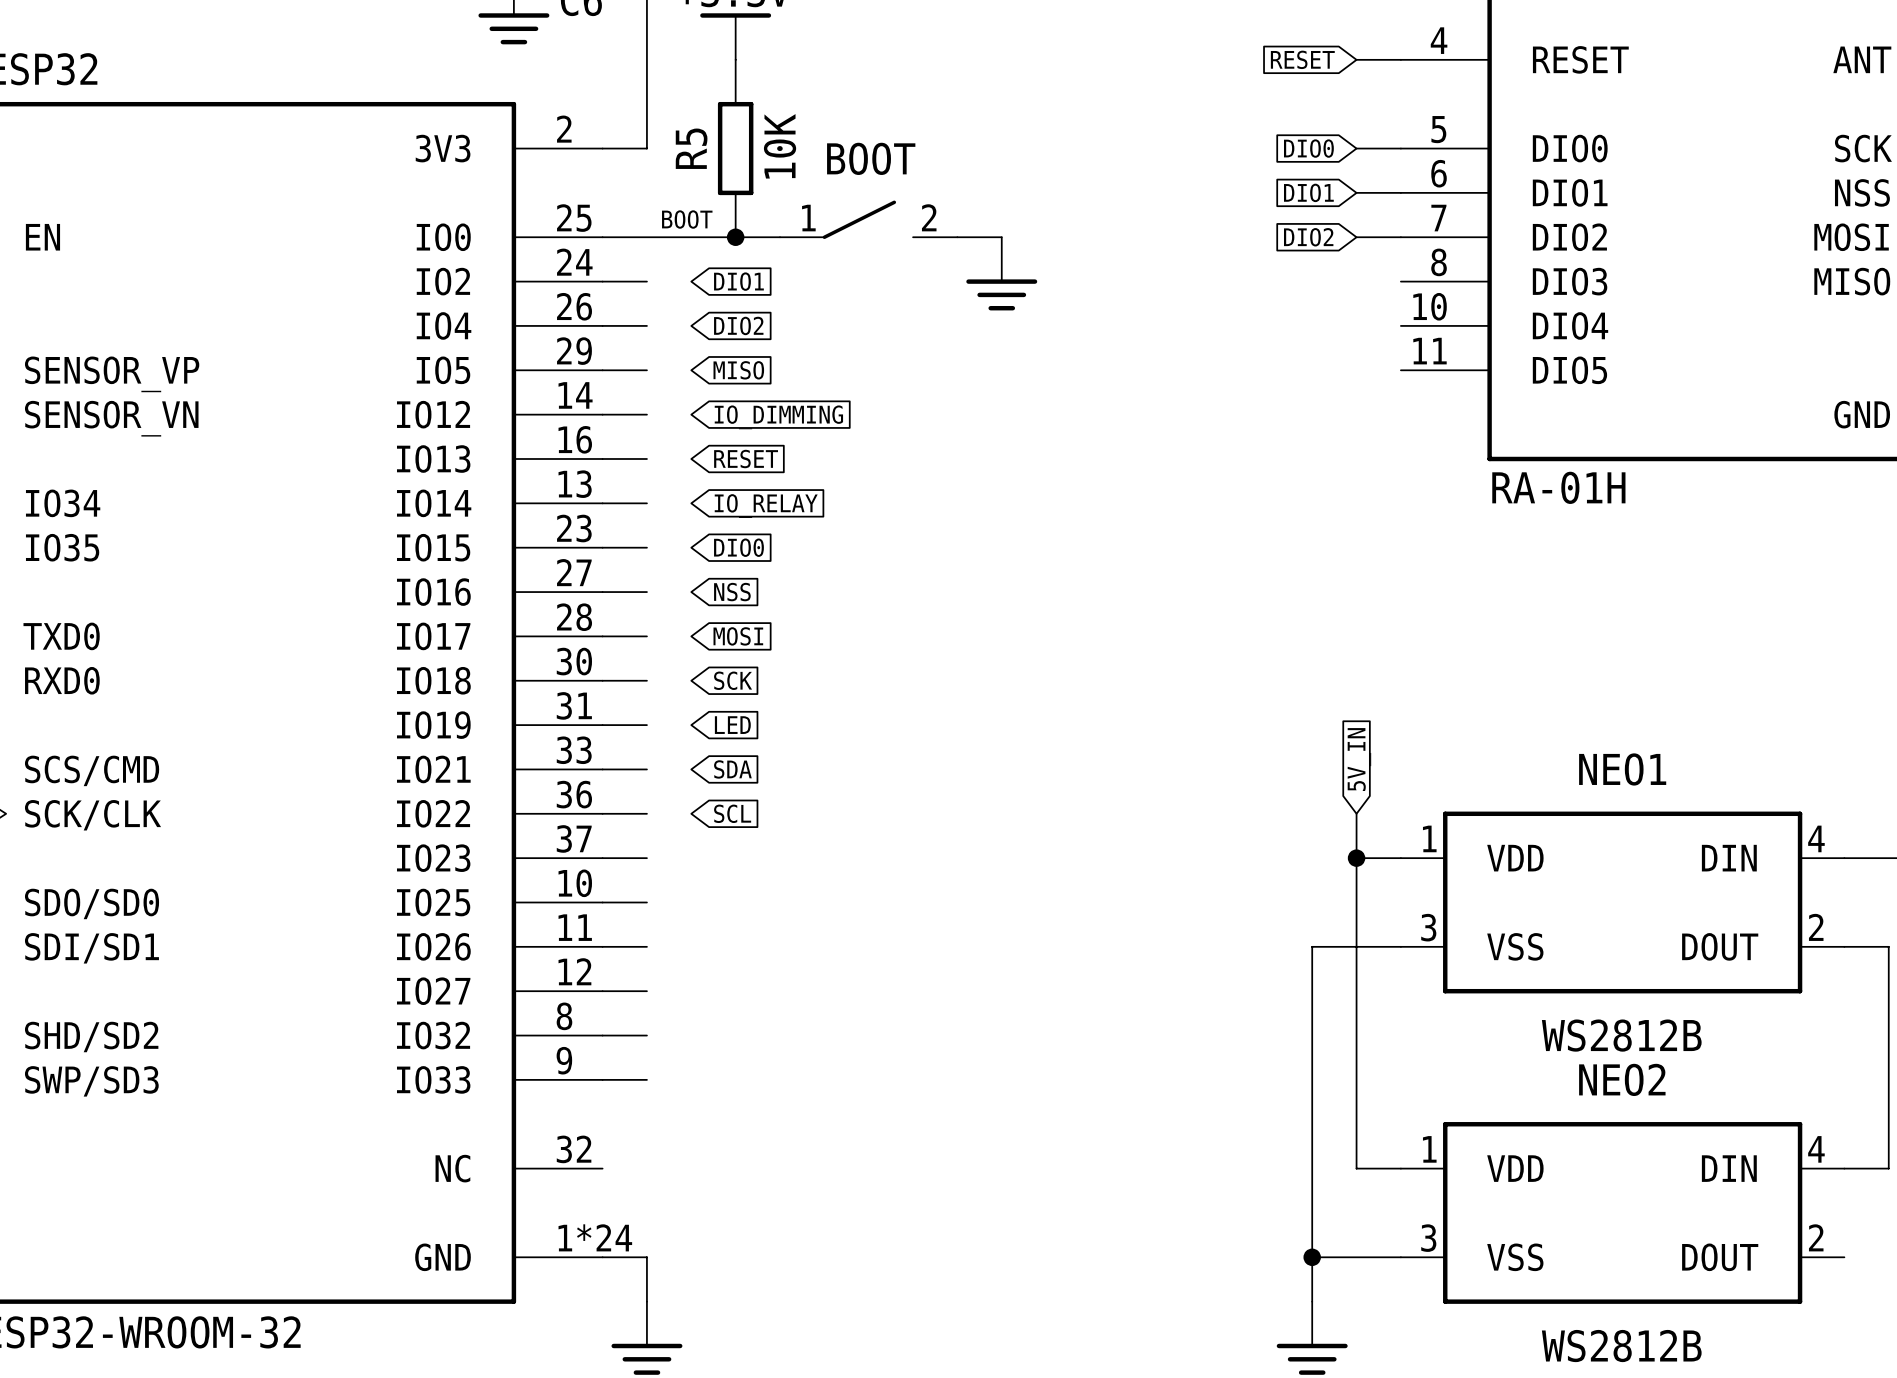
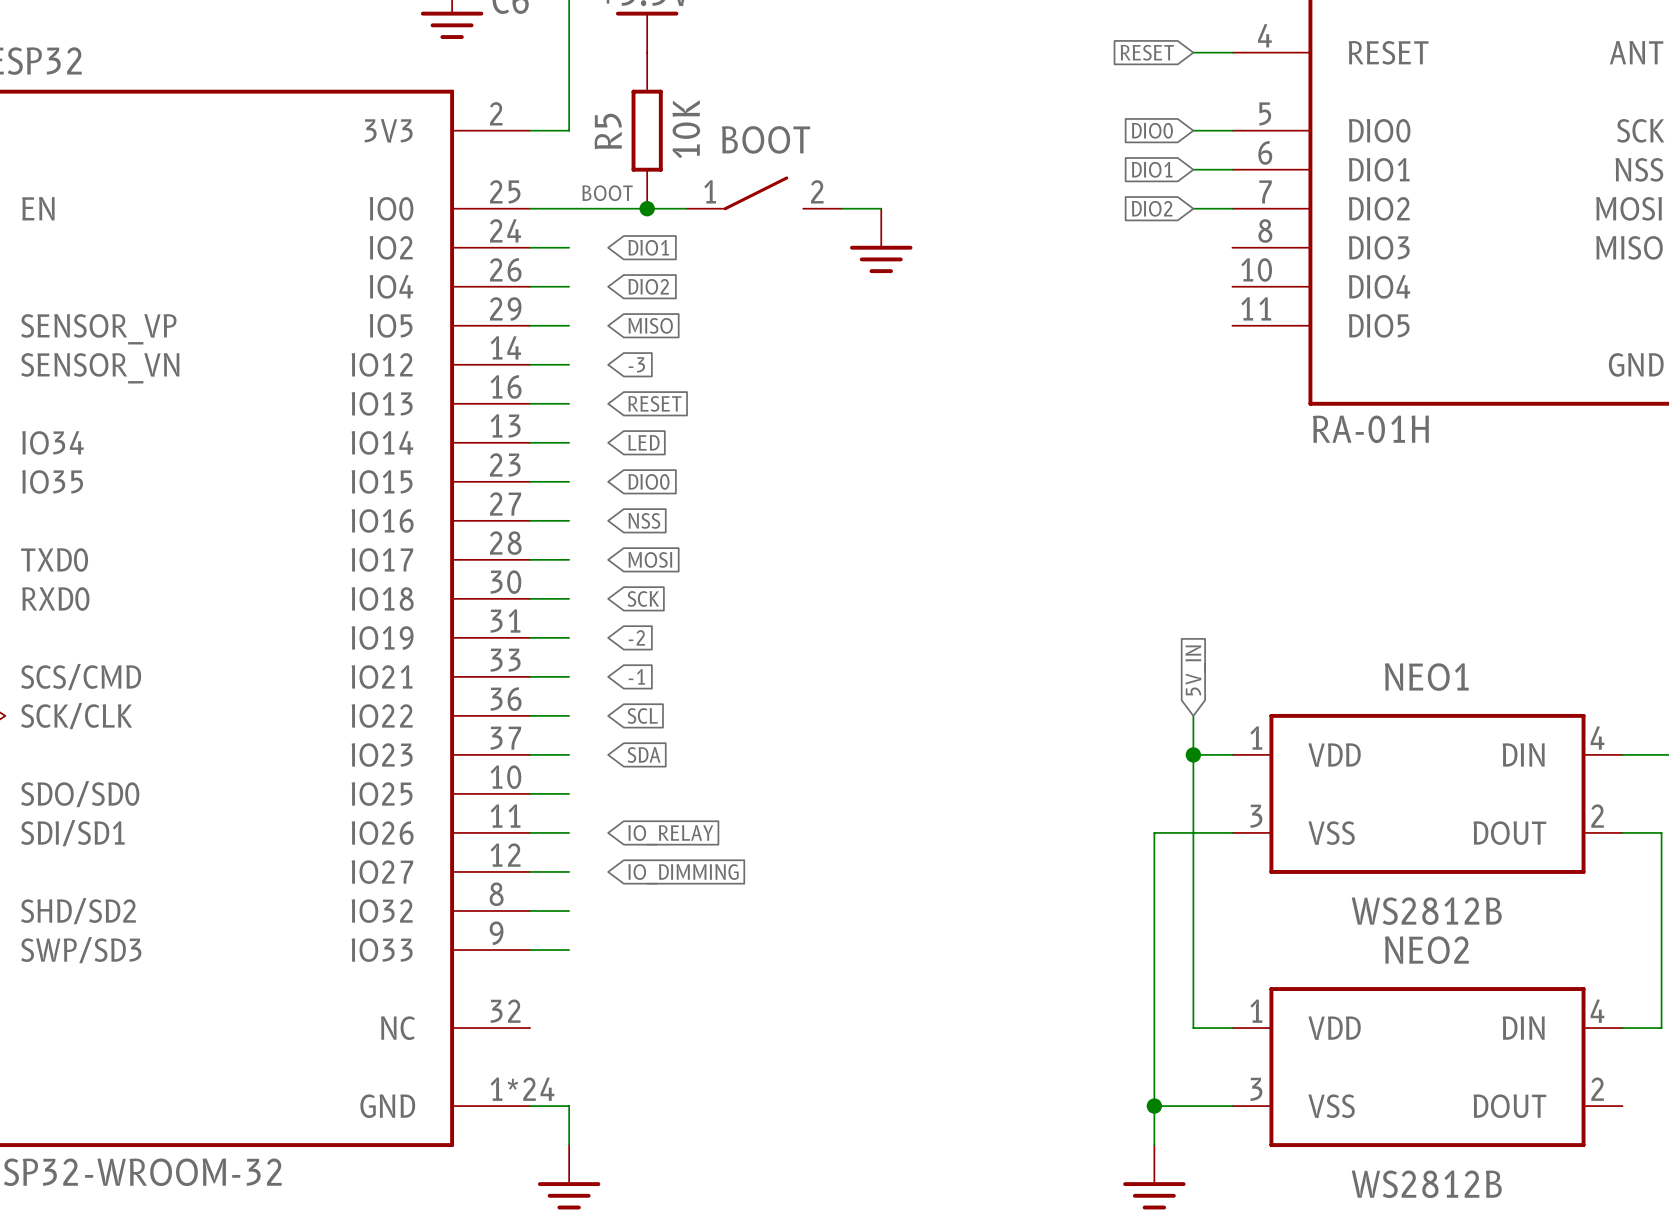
global label: IO_DIMMING (778, 417) -> -3 (636, 364)
global label: IO_RELAY (766, 506) -> LED (643, 442)
global label: LED (732, 725) -> -2 (636, 637)
global label: SDA (732, 769) -> -1 (636, 676)
global label: none -> SDA (644, 755)
global label: none -> IO_RELAY (670, 835)
global label: none -> IO_DIMMING (683, 874)

